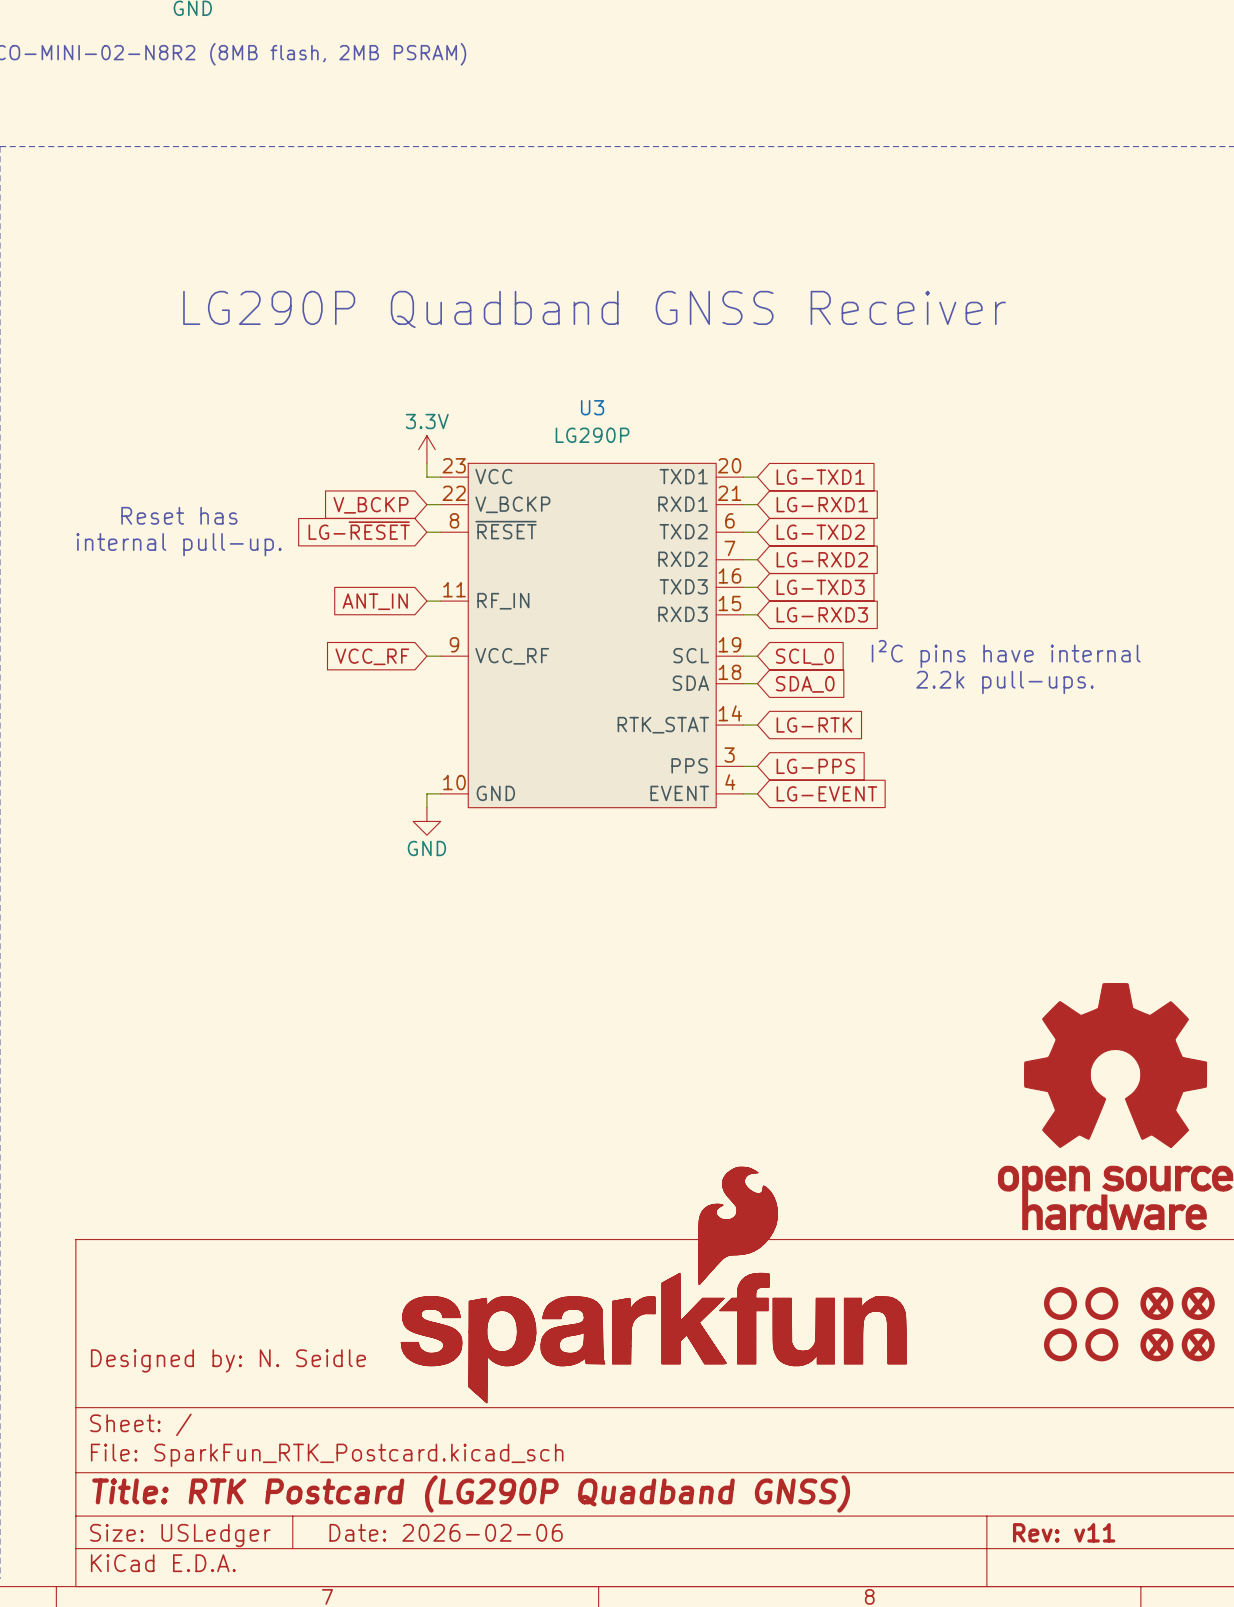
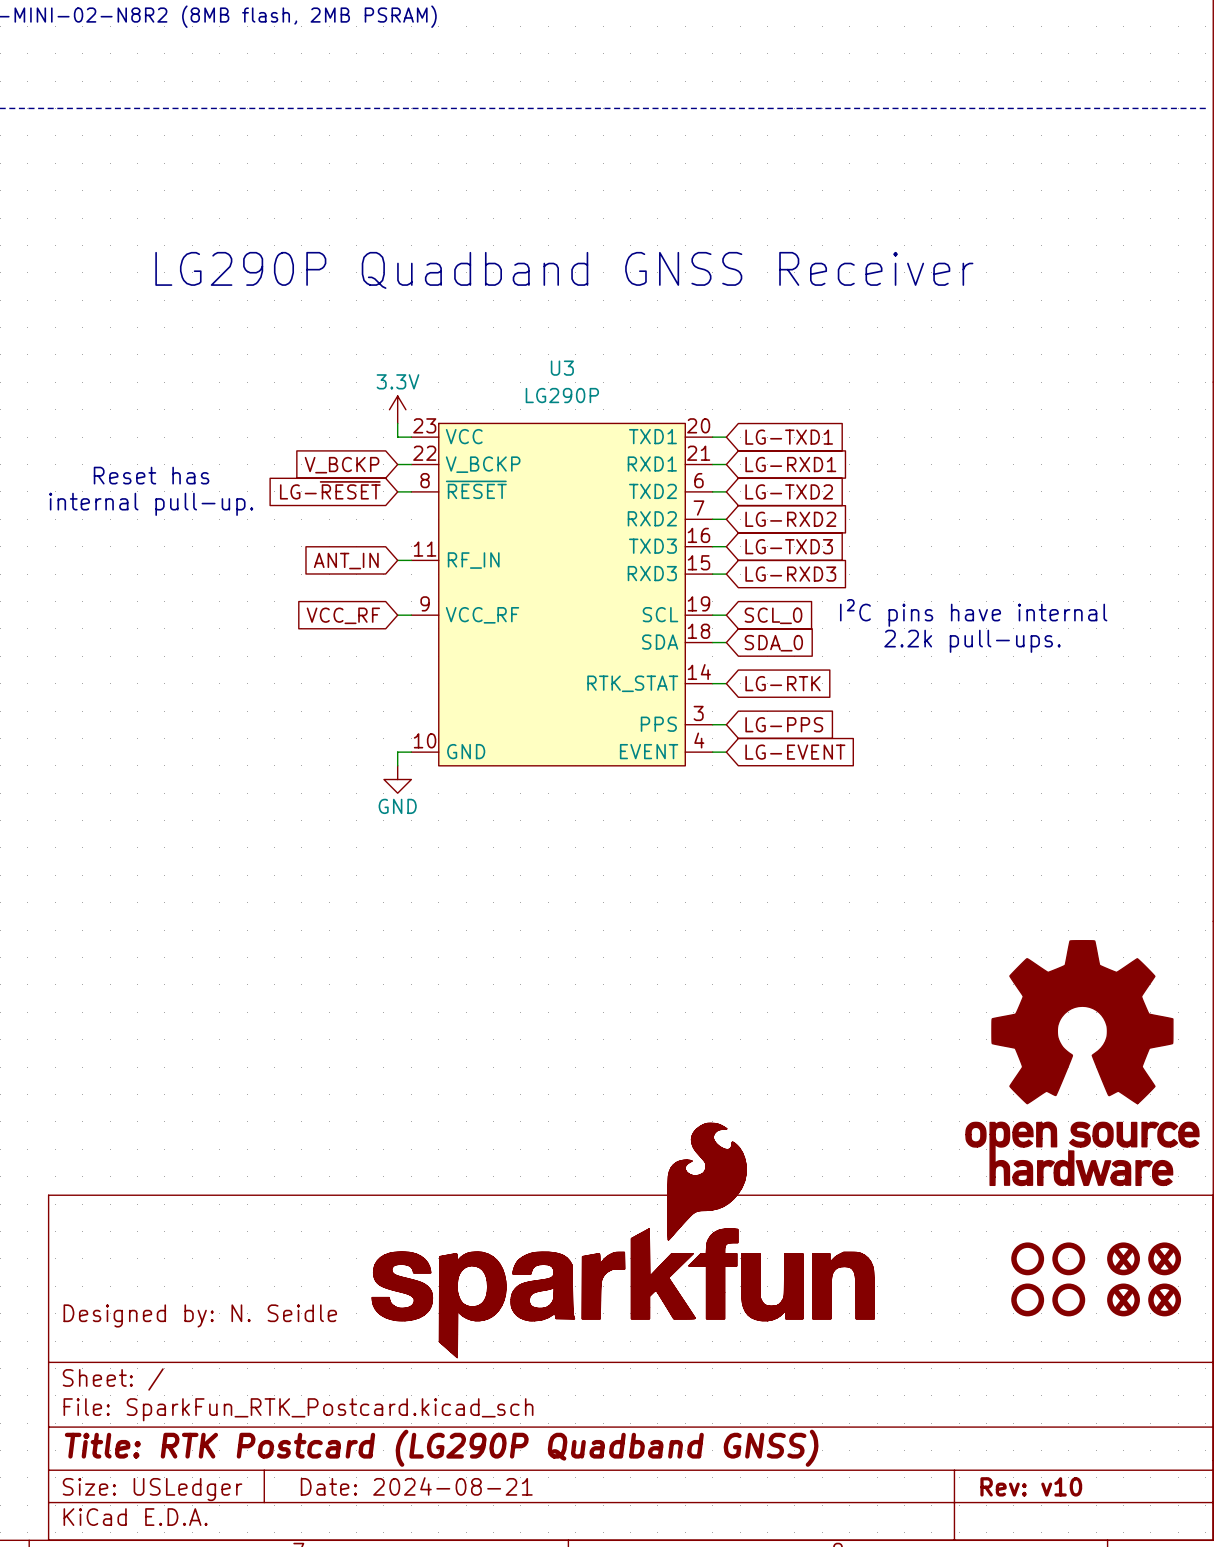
title block: Date: 2026-02-06 (446, 1532) -> Date: 2024-08-21 (416, 1486)
title block: Rev: v11 (1064, 1532) -> Rev: v10 (1031, 1486)

